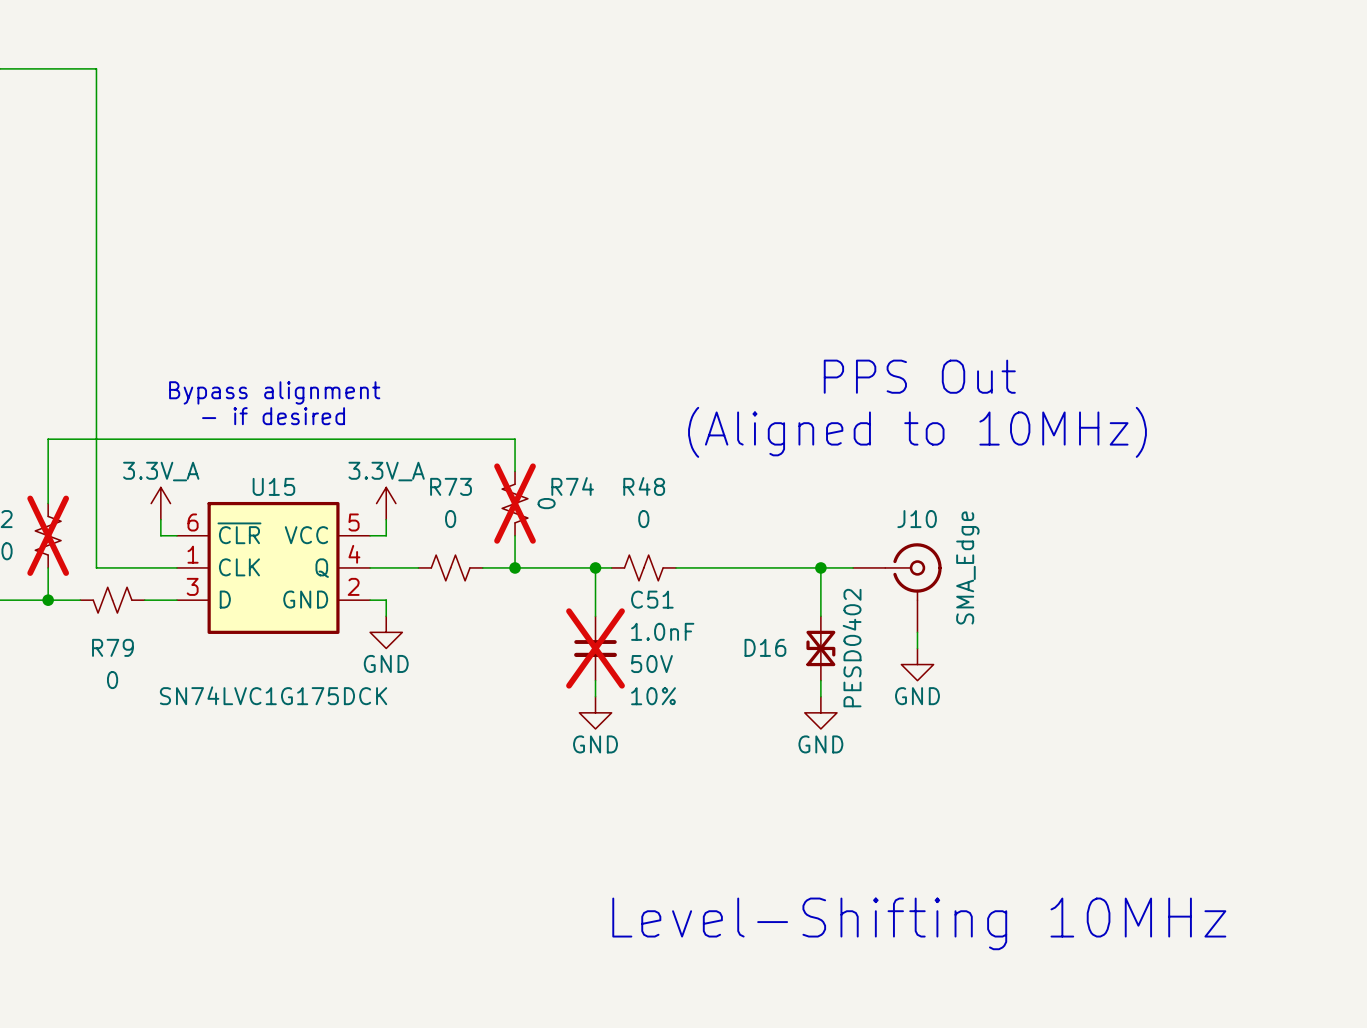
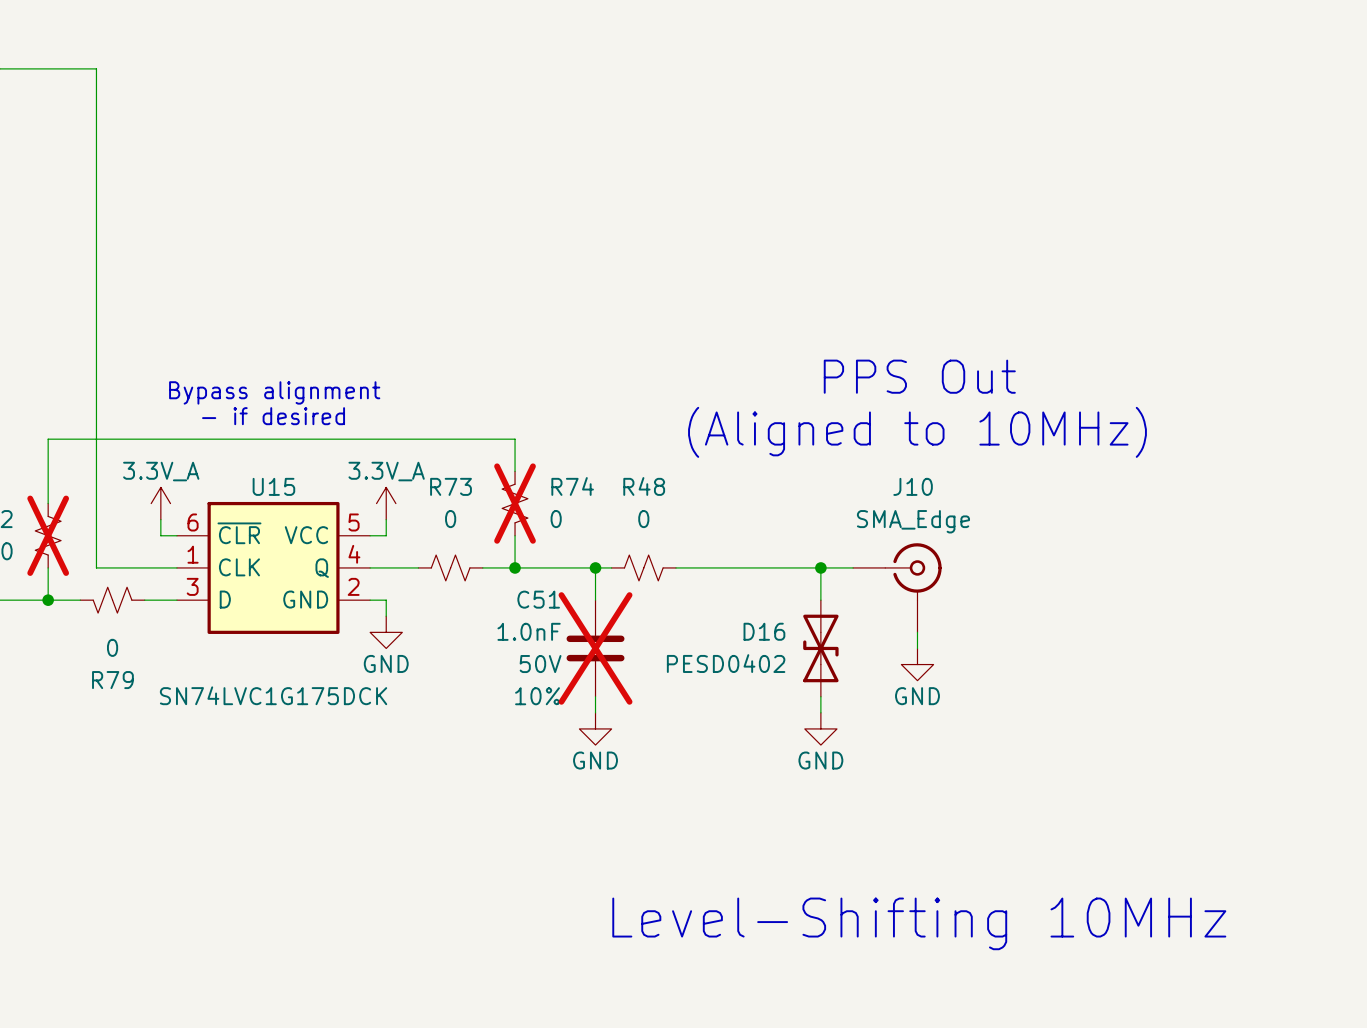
R74 value rotation: 0° (546, 503) -> 90° clockwise (556, 519)
J10 name position: J10 (917, 519) -> J10 (913, 486)
J10 value rotation: 0° (967, 567) -> 90° clockwise (913, 521)
C51 name position: C51 (652, 599) -> C51 (538, 599)
C51 symbol: [574, 616, 617, 681] -> [566, 600, 625, 697]
D16 symbol: [806, 616, 836, 681] -> [803, 600, 839, 697]
C51 value position: 1.0nF (662, 631) -> 1.0nF (529, 631)
R79 name position: R79 (112, 647) -> R79 (112, 680)
D16 value position: PESD0402 (852, 648) -> PESD0402 (726, 663)
C51 text position: 50V (651, 664) -> 50V (540, 664)
R79 value position: 0 (112, 680) -> 0 (112, 647)
C51 text position: 10% (653, 696) -> 10% (537, 696)
power symbol position: GND (595, 712) -> GND (595, 728)
power symbol position: GND (820, 712) -> GND (820, 728)

